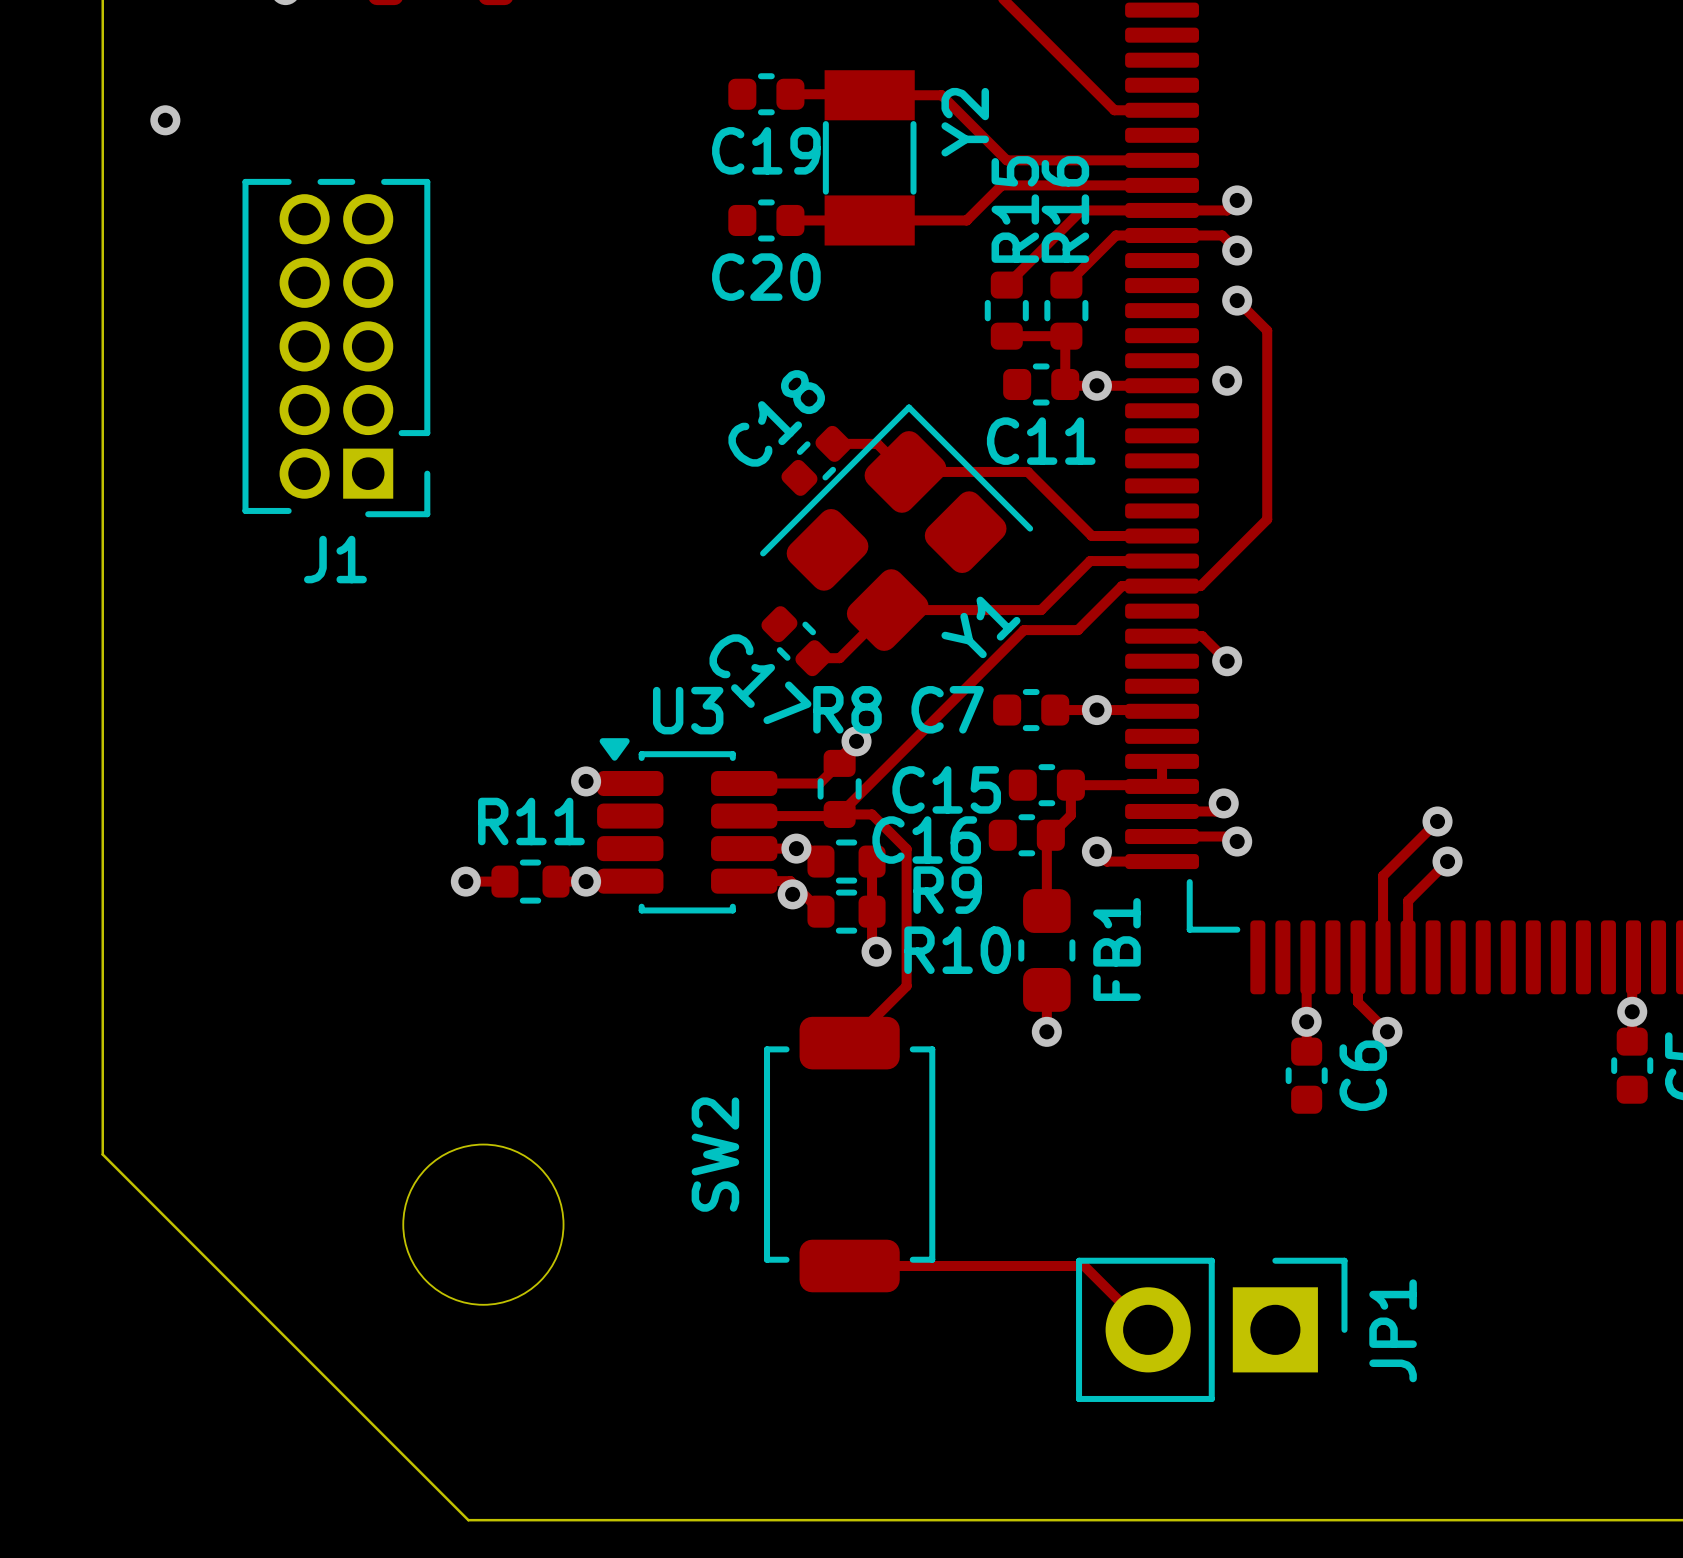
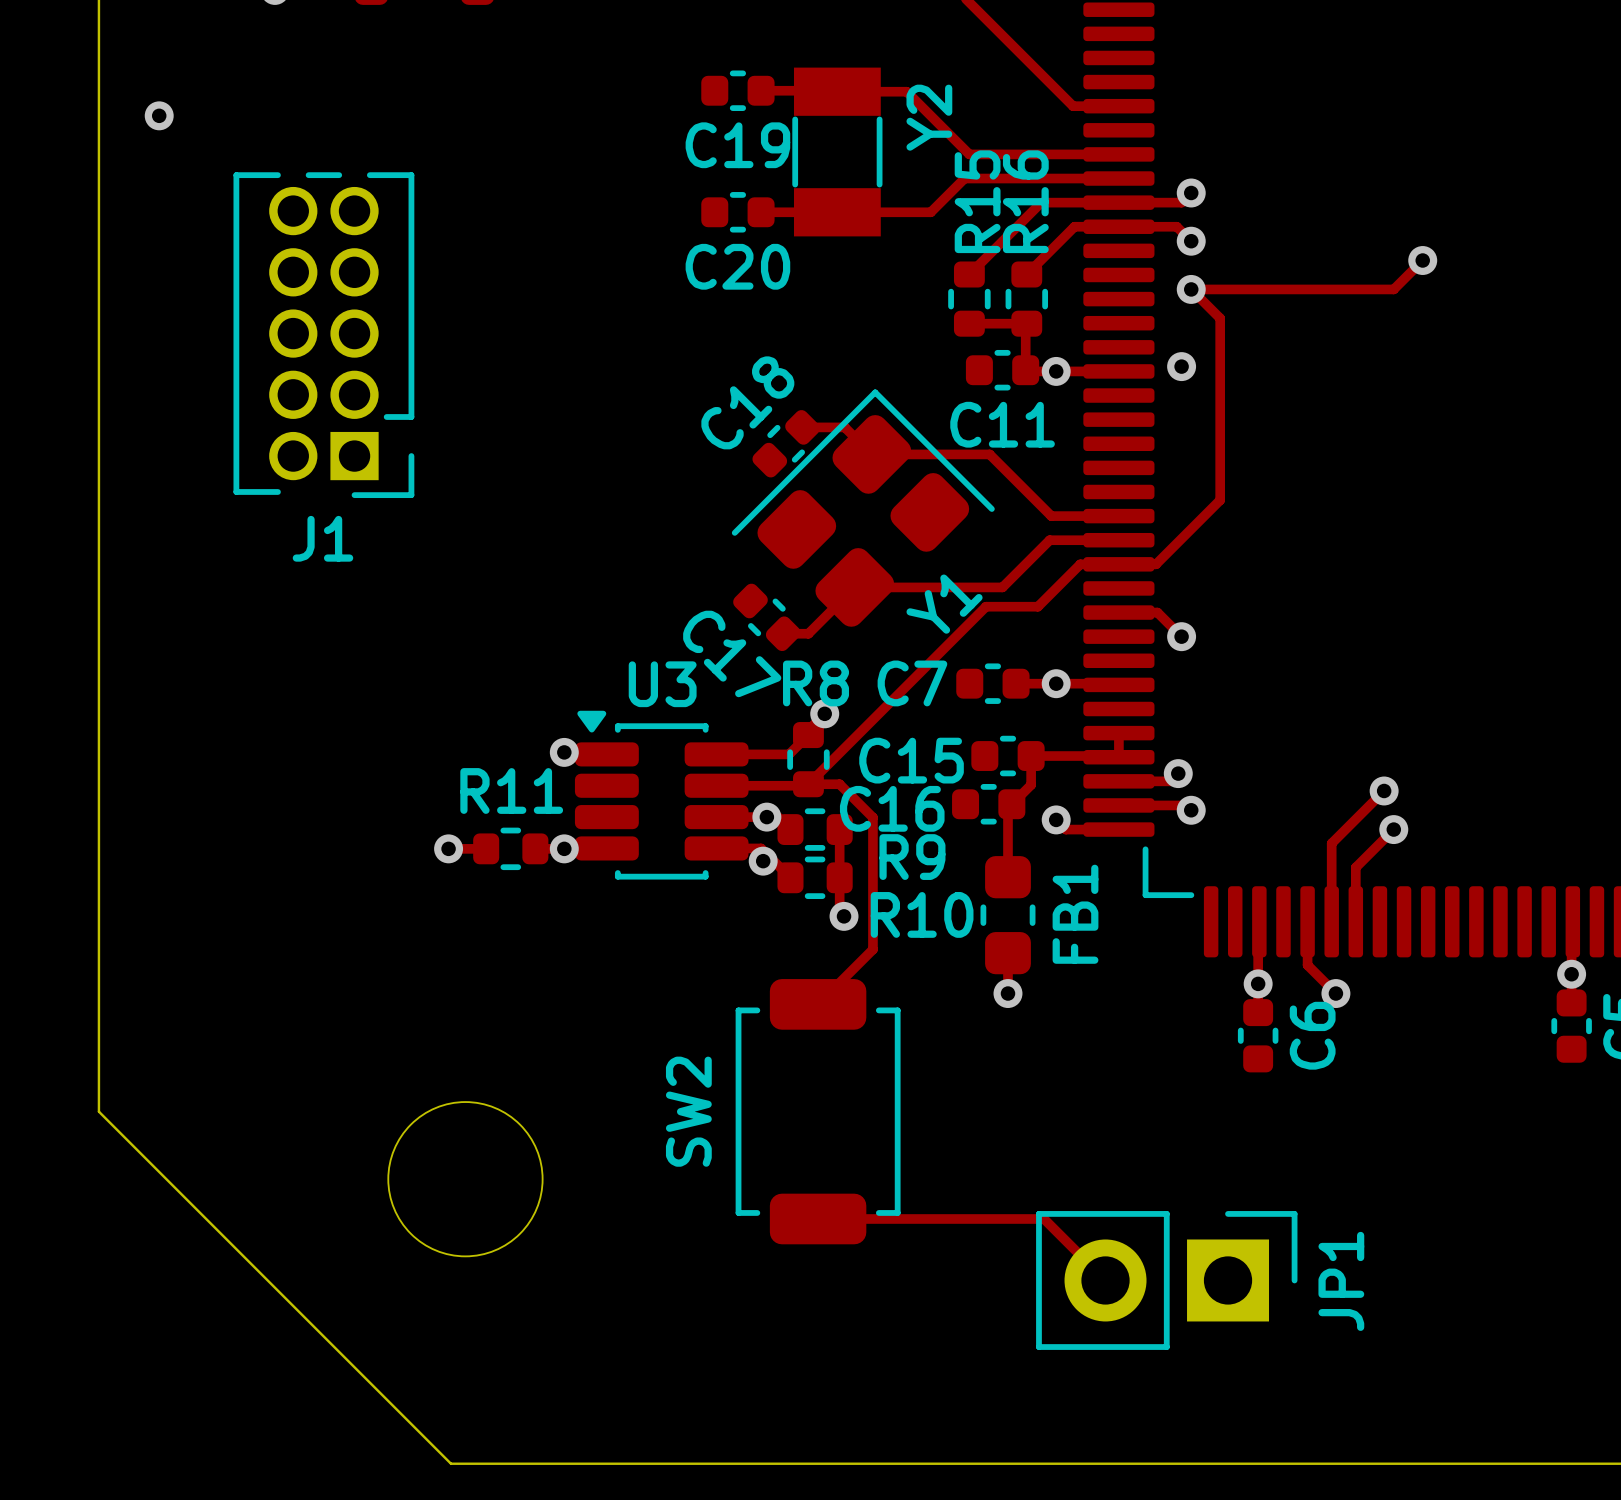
track: none -> (1422, 260) (1393, 289) (1191, 289)
via: none -> (1422, 260)

